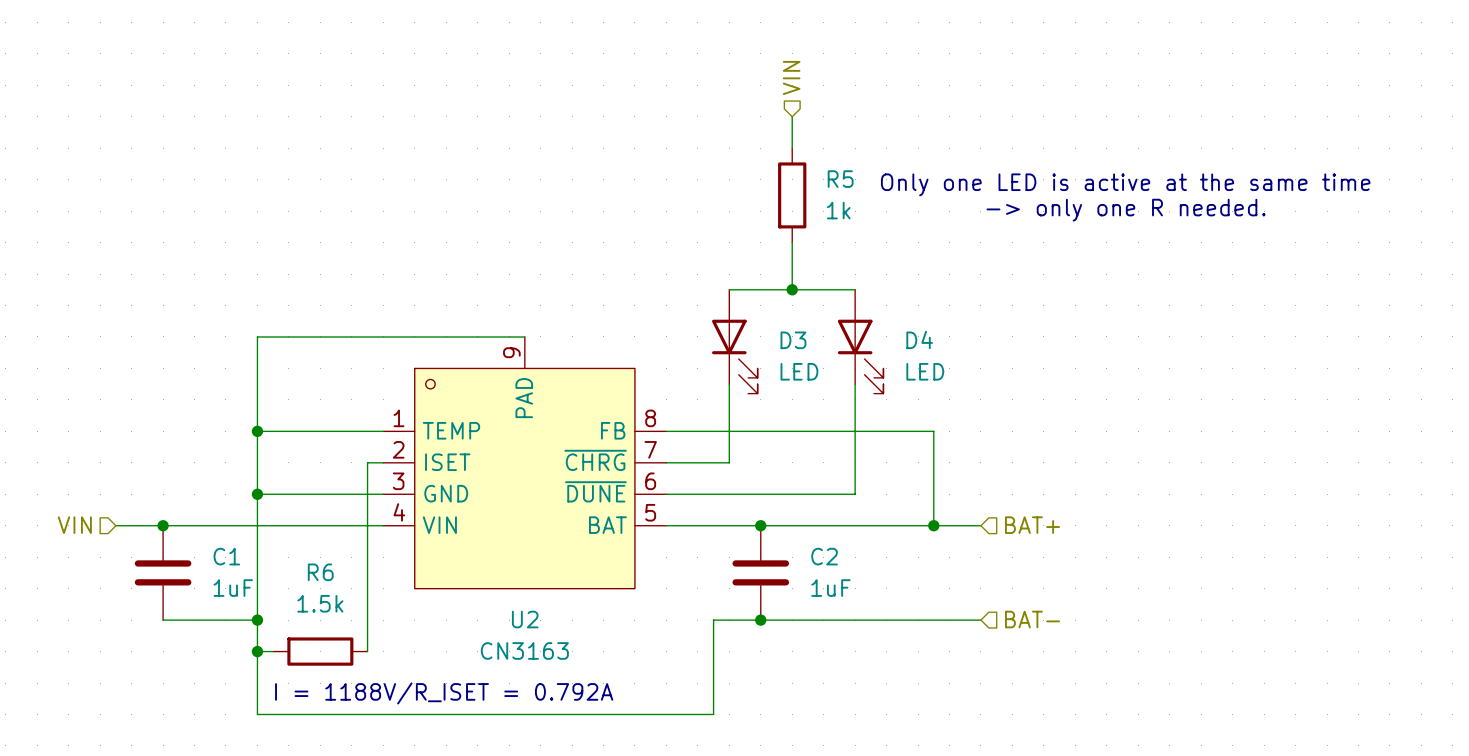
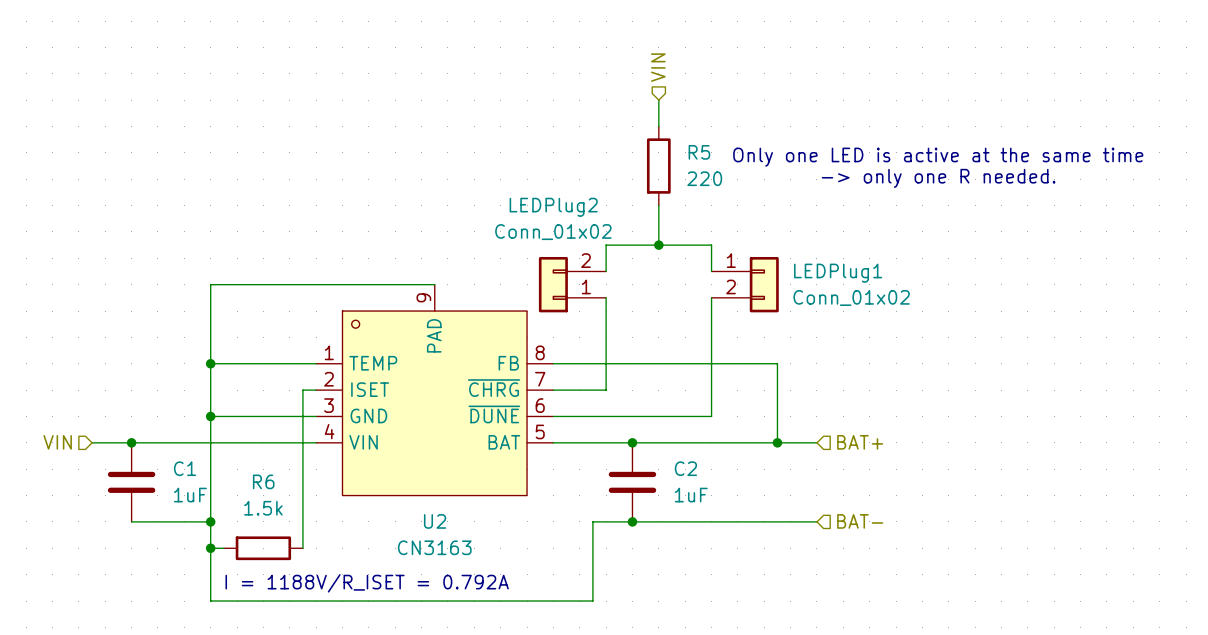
R5 value: 1k (838, 210) -> 220 (704, 178)
LEDPlug2: none -> Conn_01x02 (572, 284)
LEDPlug1: none -> Conn_01x02 (745, 284)
D3: LED (734, 341) -> none
D4: LED (860, 341) -> none

